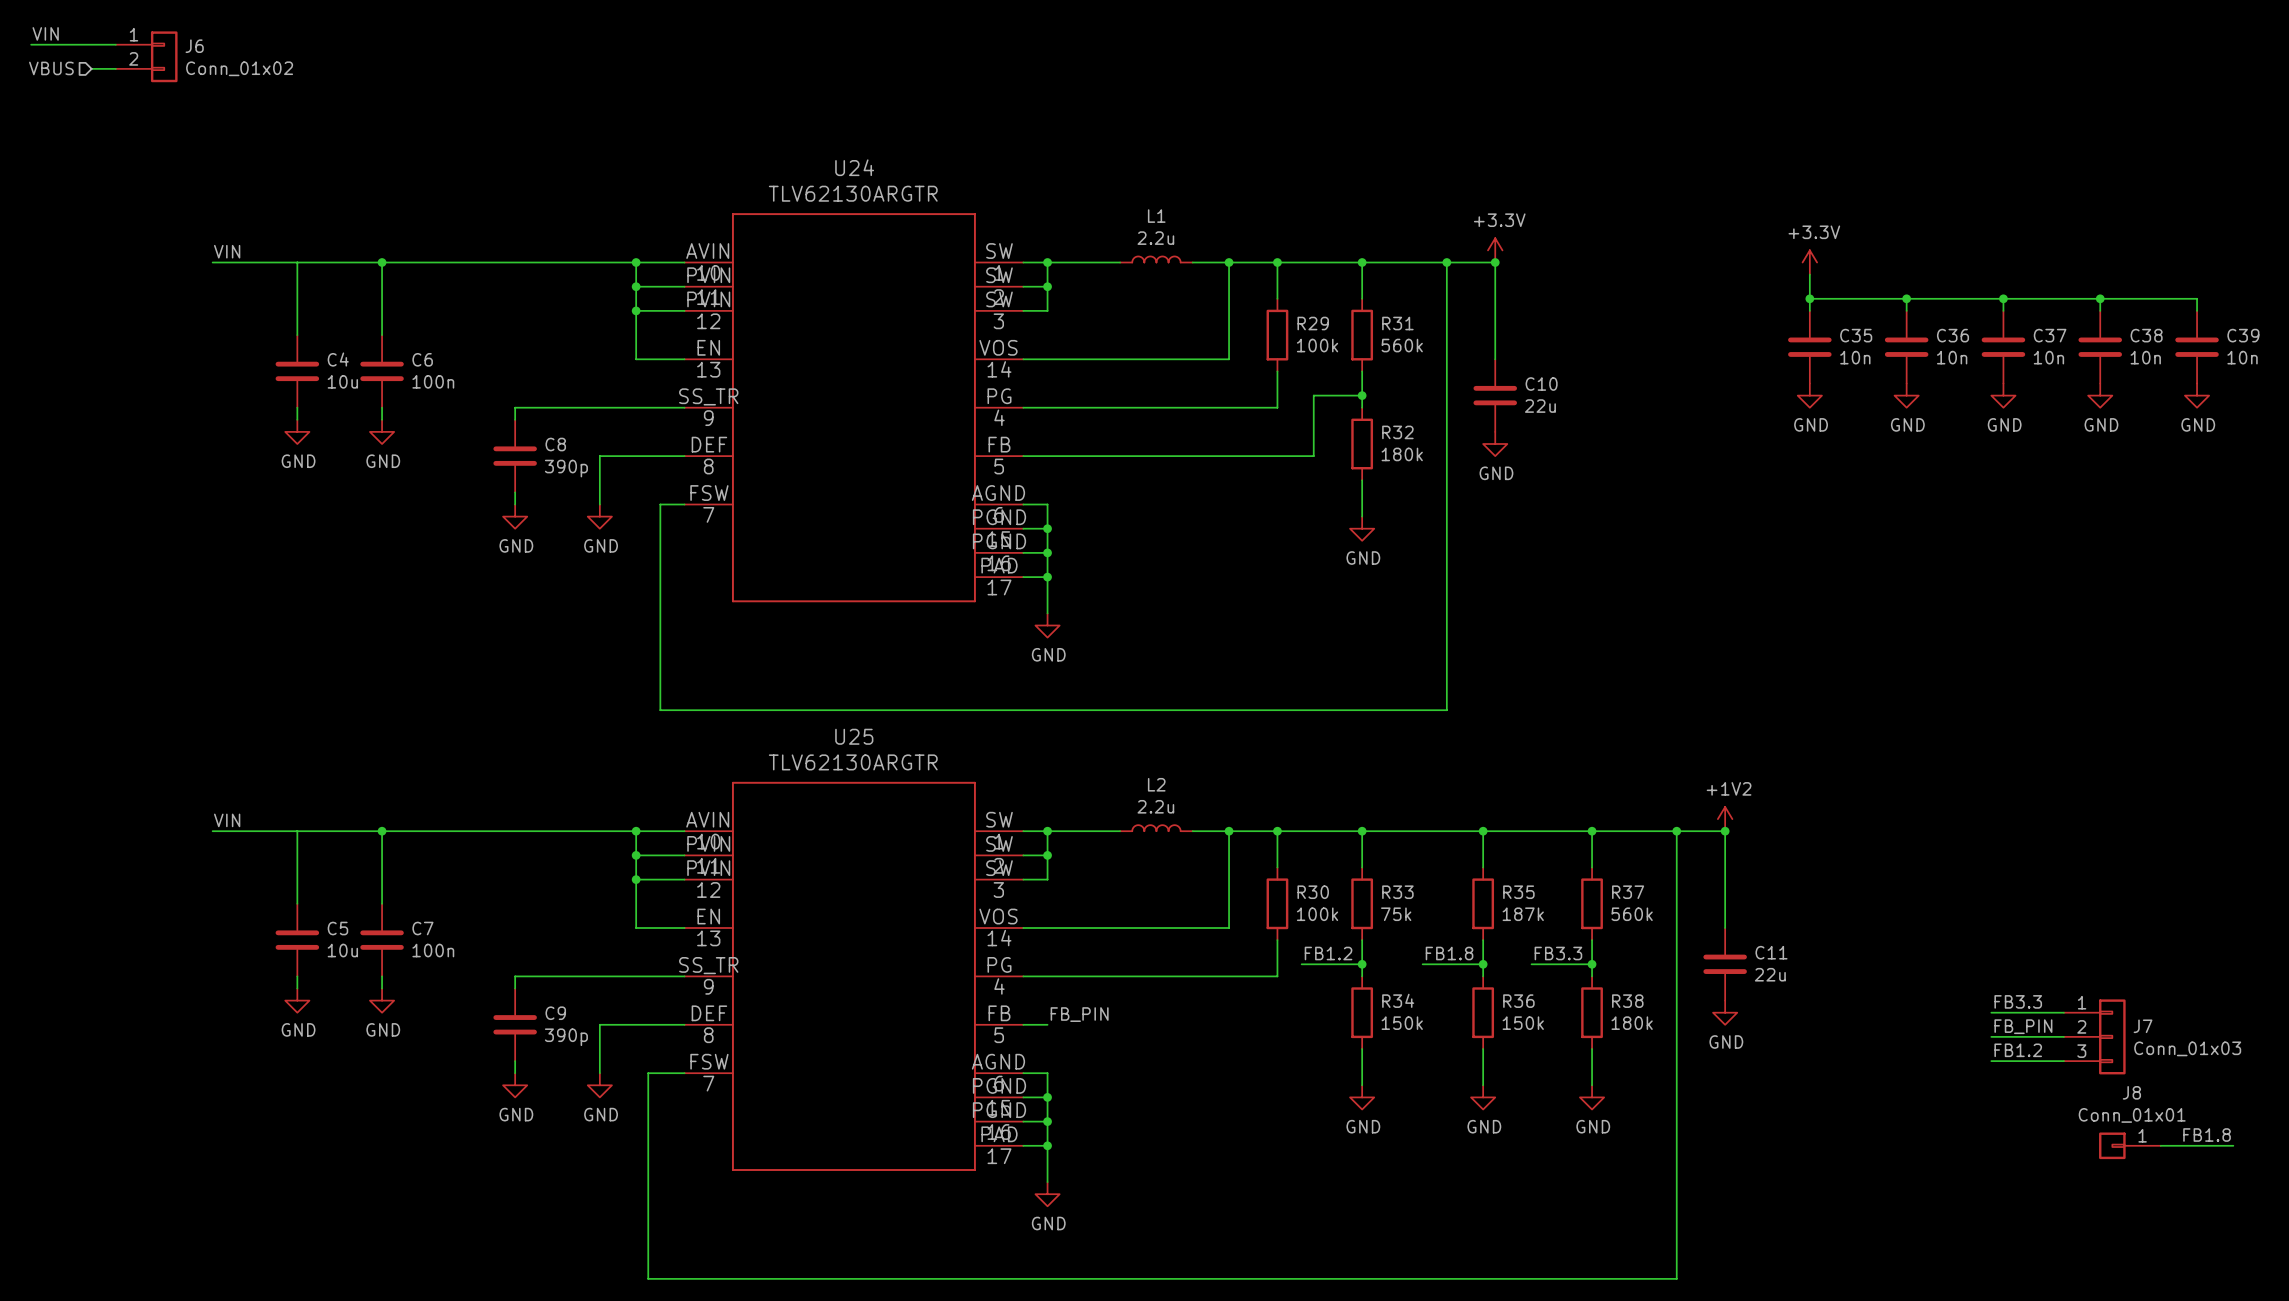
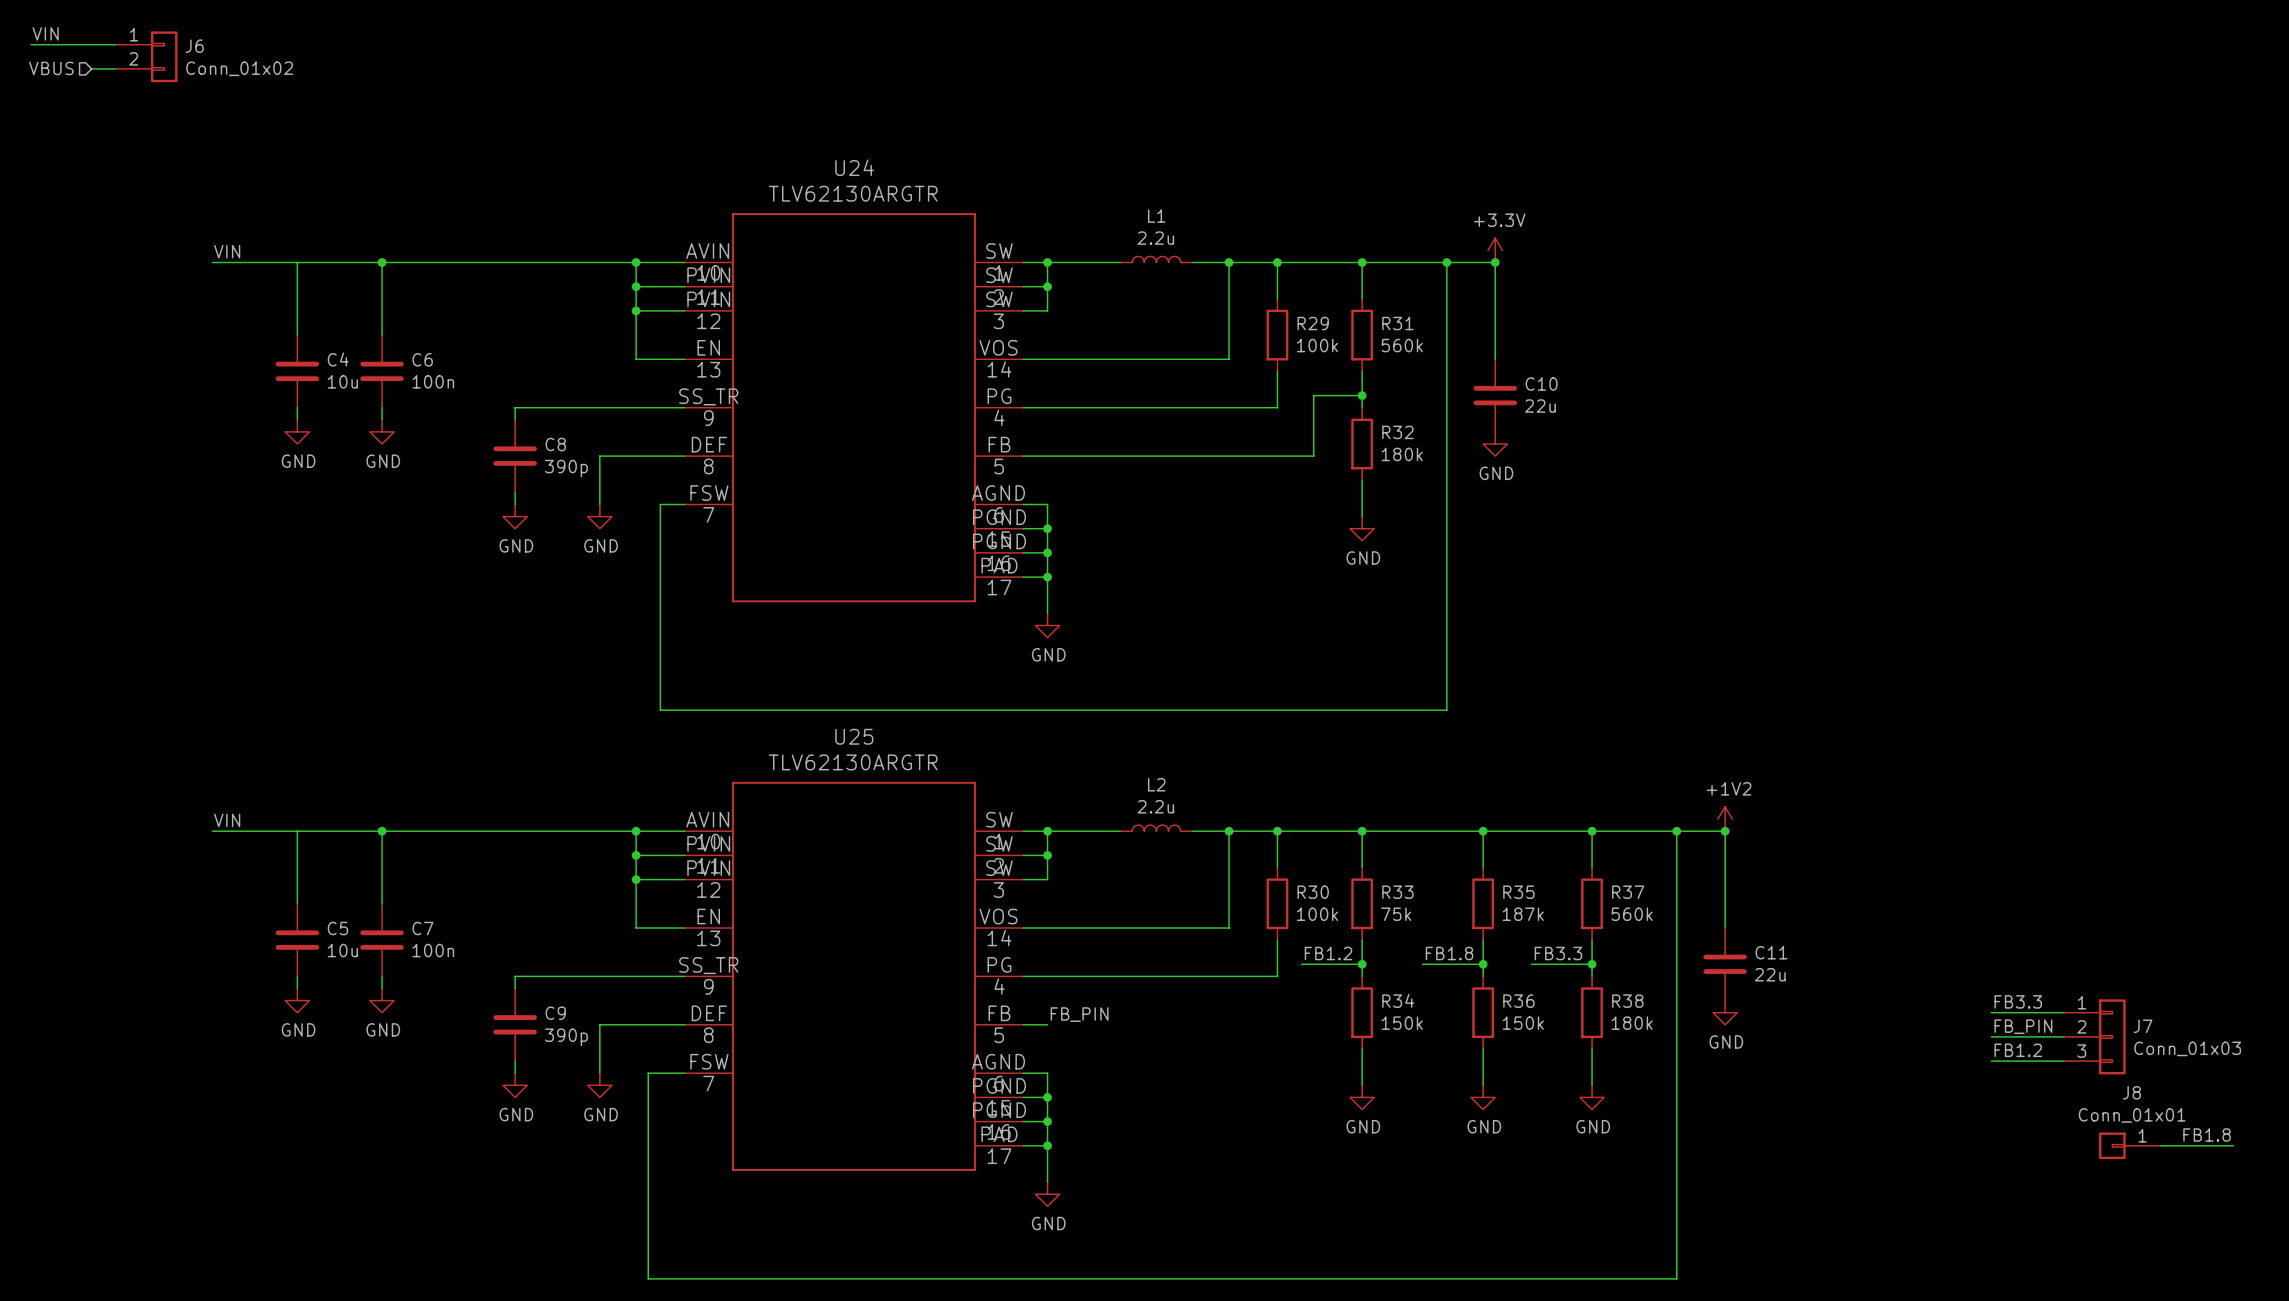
power symbol: +3.3V (1809, 262) -> none
wire: (1809, 274) (1809, 310) -> none
wire: (1809, 298) (2197, 298) (2197, 310) -> none
junction: (1809, 298) -> none
wire: (1906, 298) (1906, 310) -> none
junction: (1906, 298) -> none
wire: (2003, 298) (2003, 310) -> none
junction: (2003, 298) -> none
wire: (2100, 298) (2100, 310) -> none
junction: (2100, 298) -> none
C35: 10n (1809, 347) -> none
C36: 10n (1906, 347) -> none
C37: 10n (2003, 347) -> none
C38: 10n (2100, 347) -> none
C39: 10n (2197, 347) -> none
power symbol: GND (1809, 395) -> none
power symbol: GND (1906, 395) -> none
power symbol: GND (2003, 395) -> none
power symbol: GND (2100, 395) -> none
power symbol: GND (2197, 395) -> none

